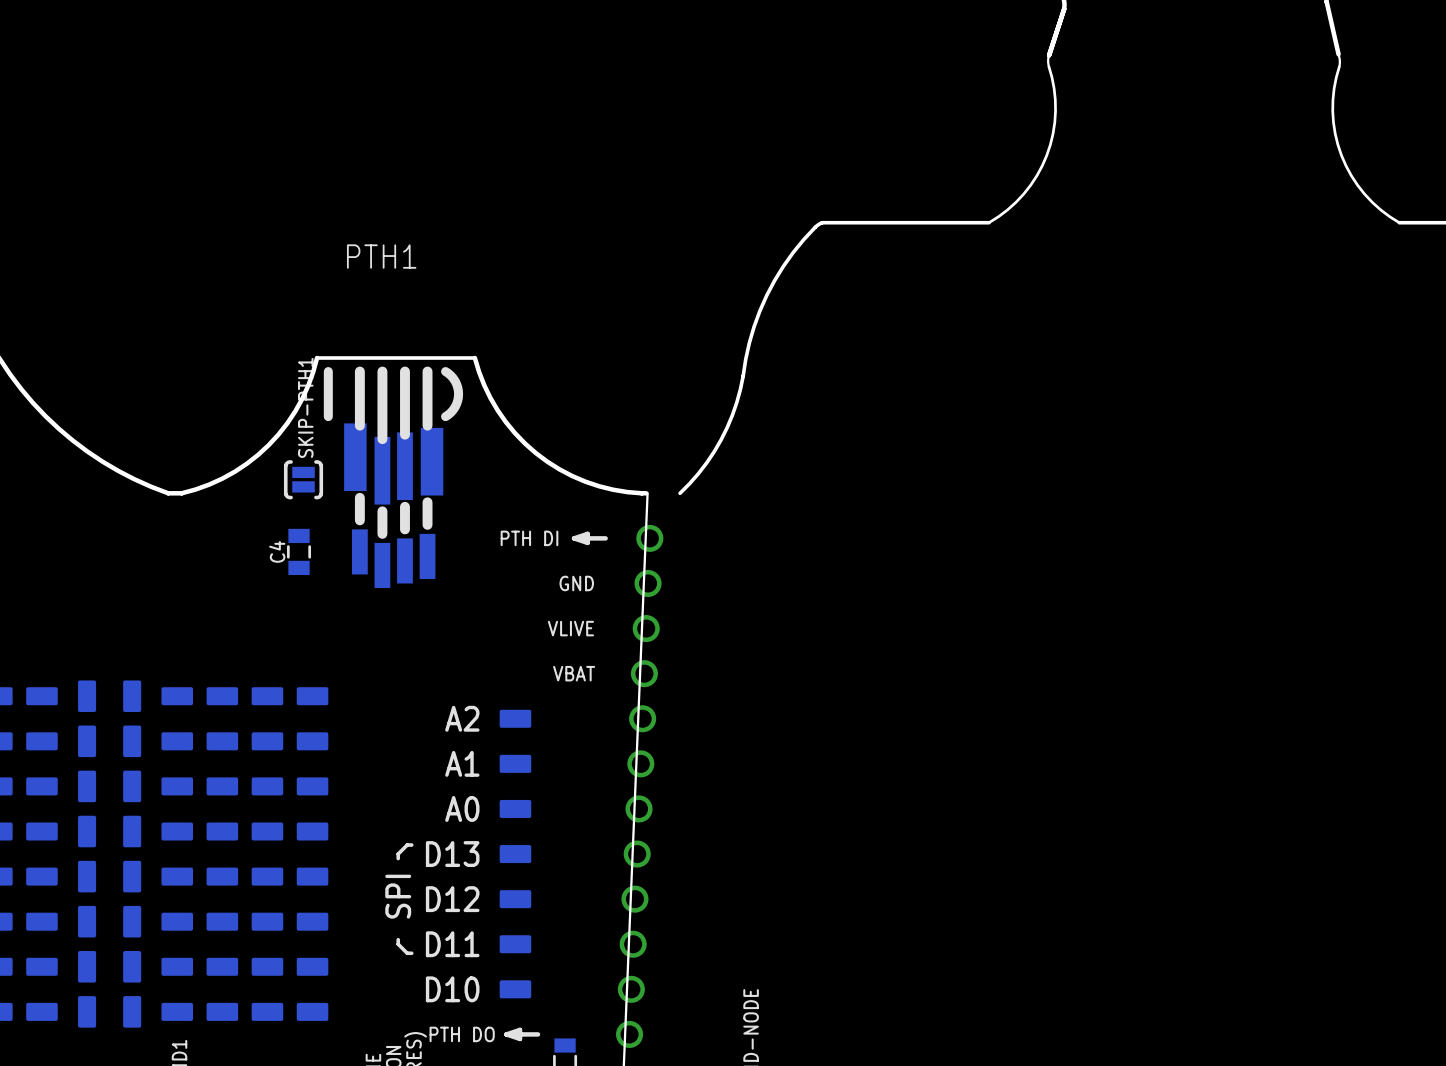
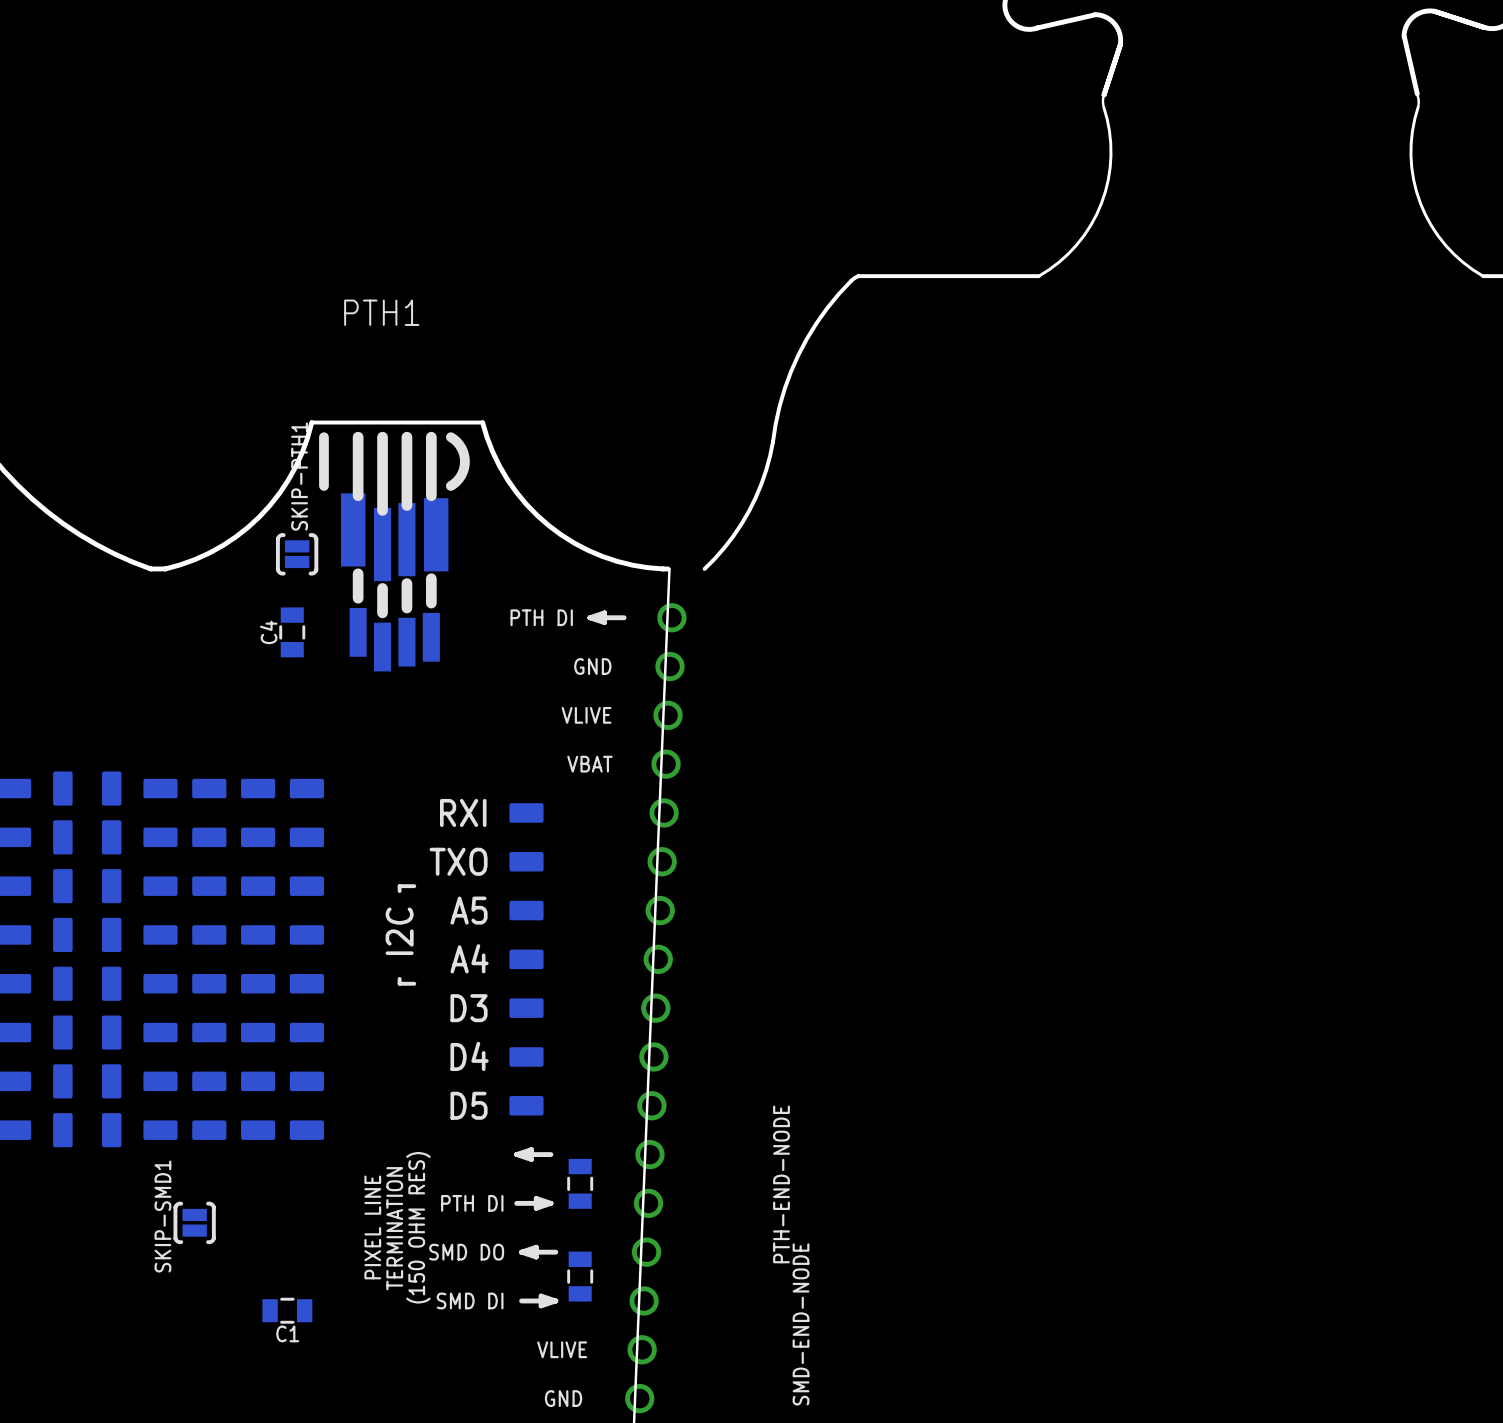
text: A2 (462, 718) -> RXI (463, 812)
text: A1 (462, 763) -> TXO (458, 861)
line: none -> (414, 886) (399, 886) (399, 891)
text: A0 (462, 808) -> A5 (469, 910)
text: none -> I2C (399, 931)
line: (411, 845) (407, 845) (398, 854) (398, 858) -> none
text: D13 (452, 854) -> A4 (469, 958)
line: none -> (399, 978) (399, 983) (414, 983)
text: SPI (398, 896) -> none
text: D12 (452, 899) -> D3 (469, 1008)
line: (398, 939) (398, 944) (407, 953) (411, 953) -> none
text: D11 (452, 944) -> D4 (469, 1056)
text: D10 (452, 989) -> D5 (469, 1105)
text: PTH DO (462, 1034) -> none

